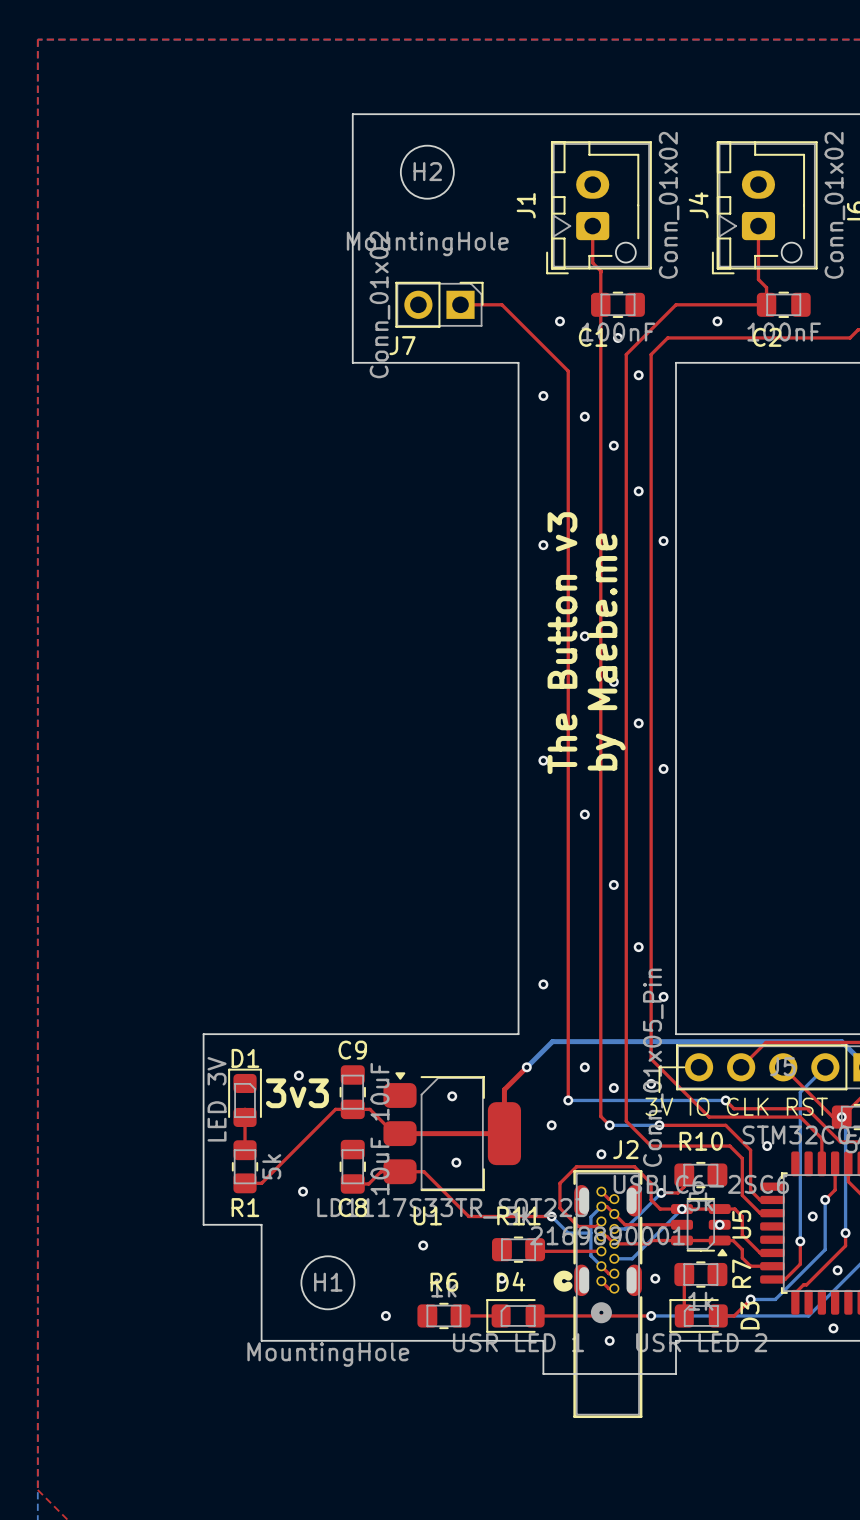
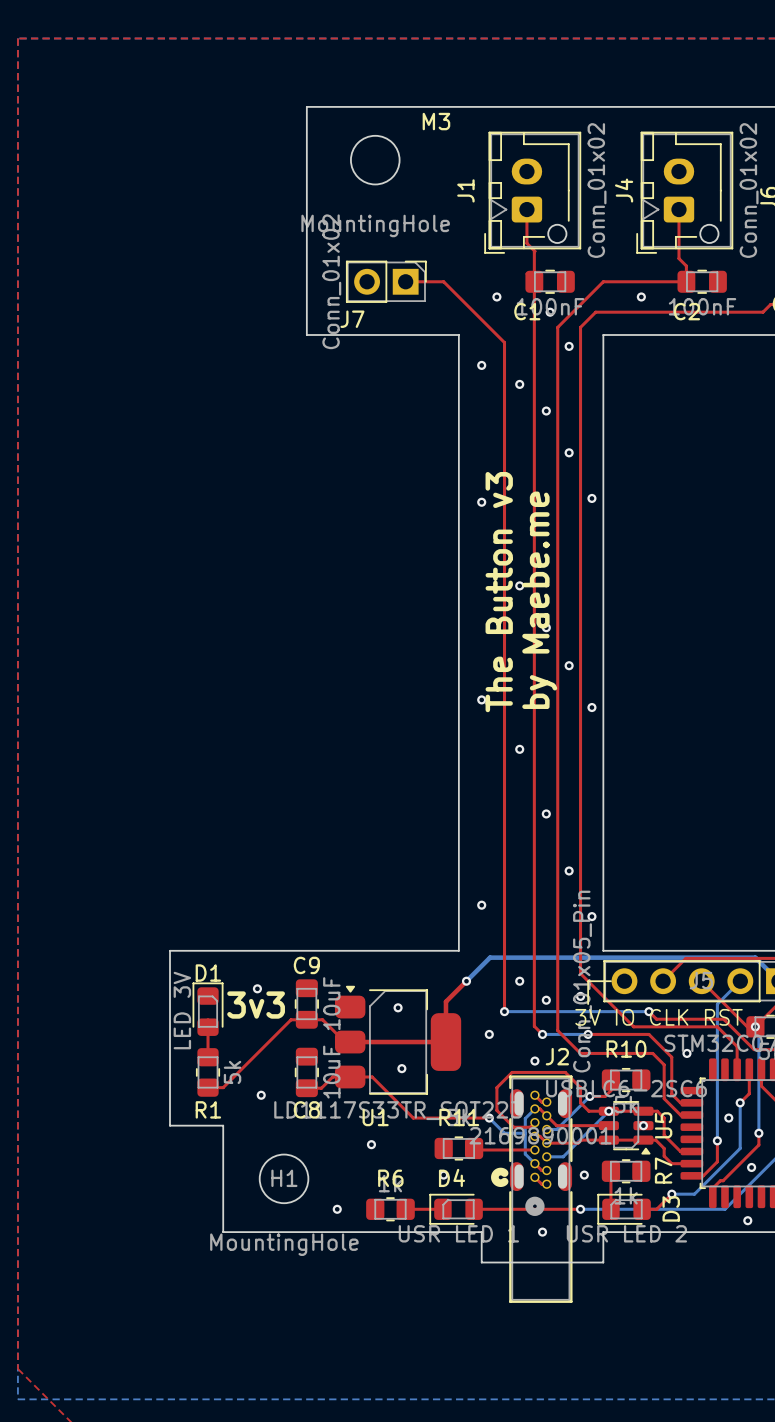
H2 name: H2 (427, 171) -> M3 (436, 121)

